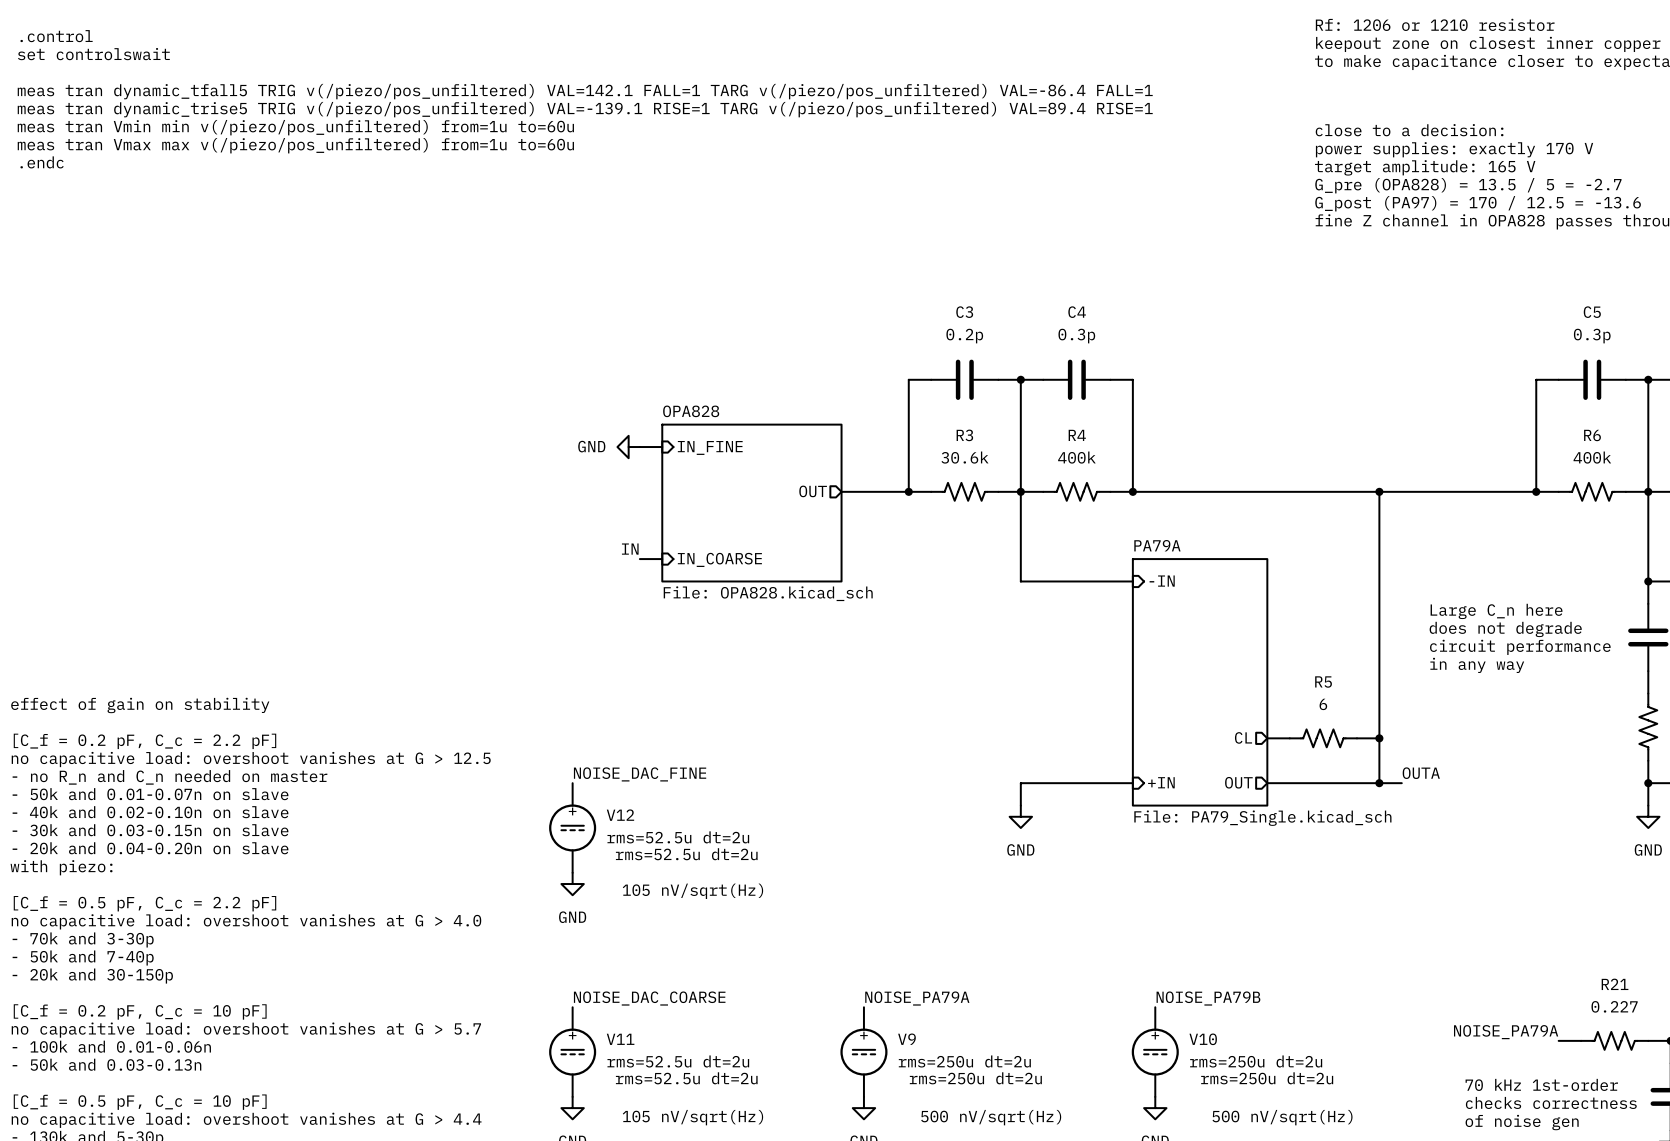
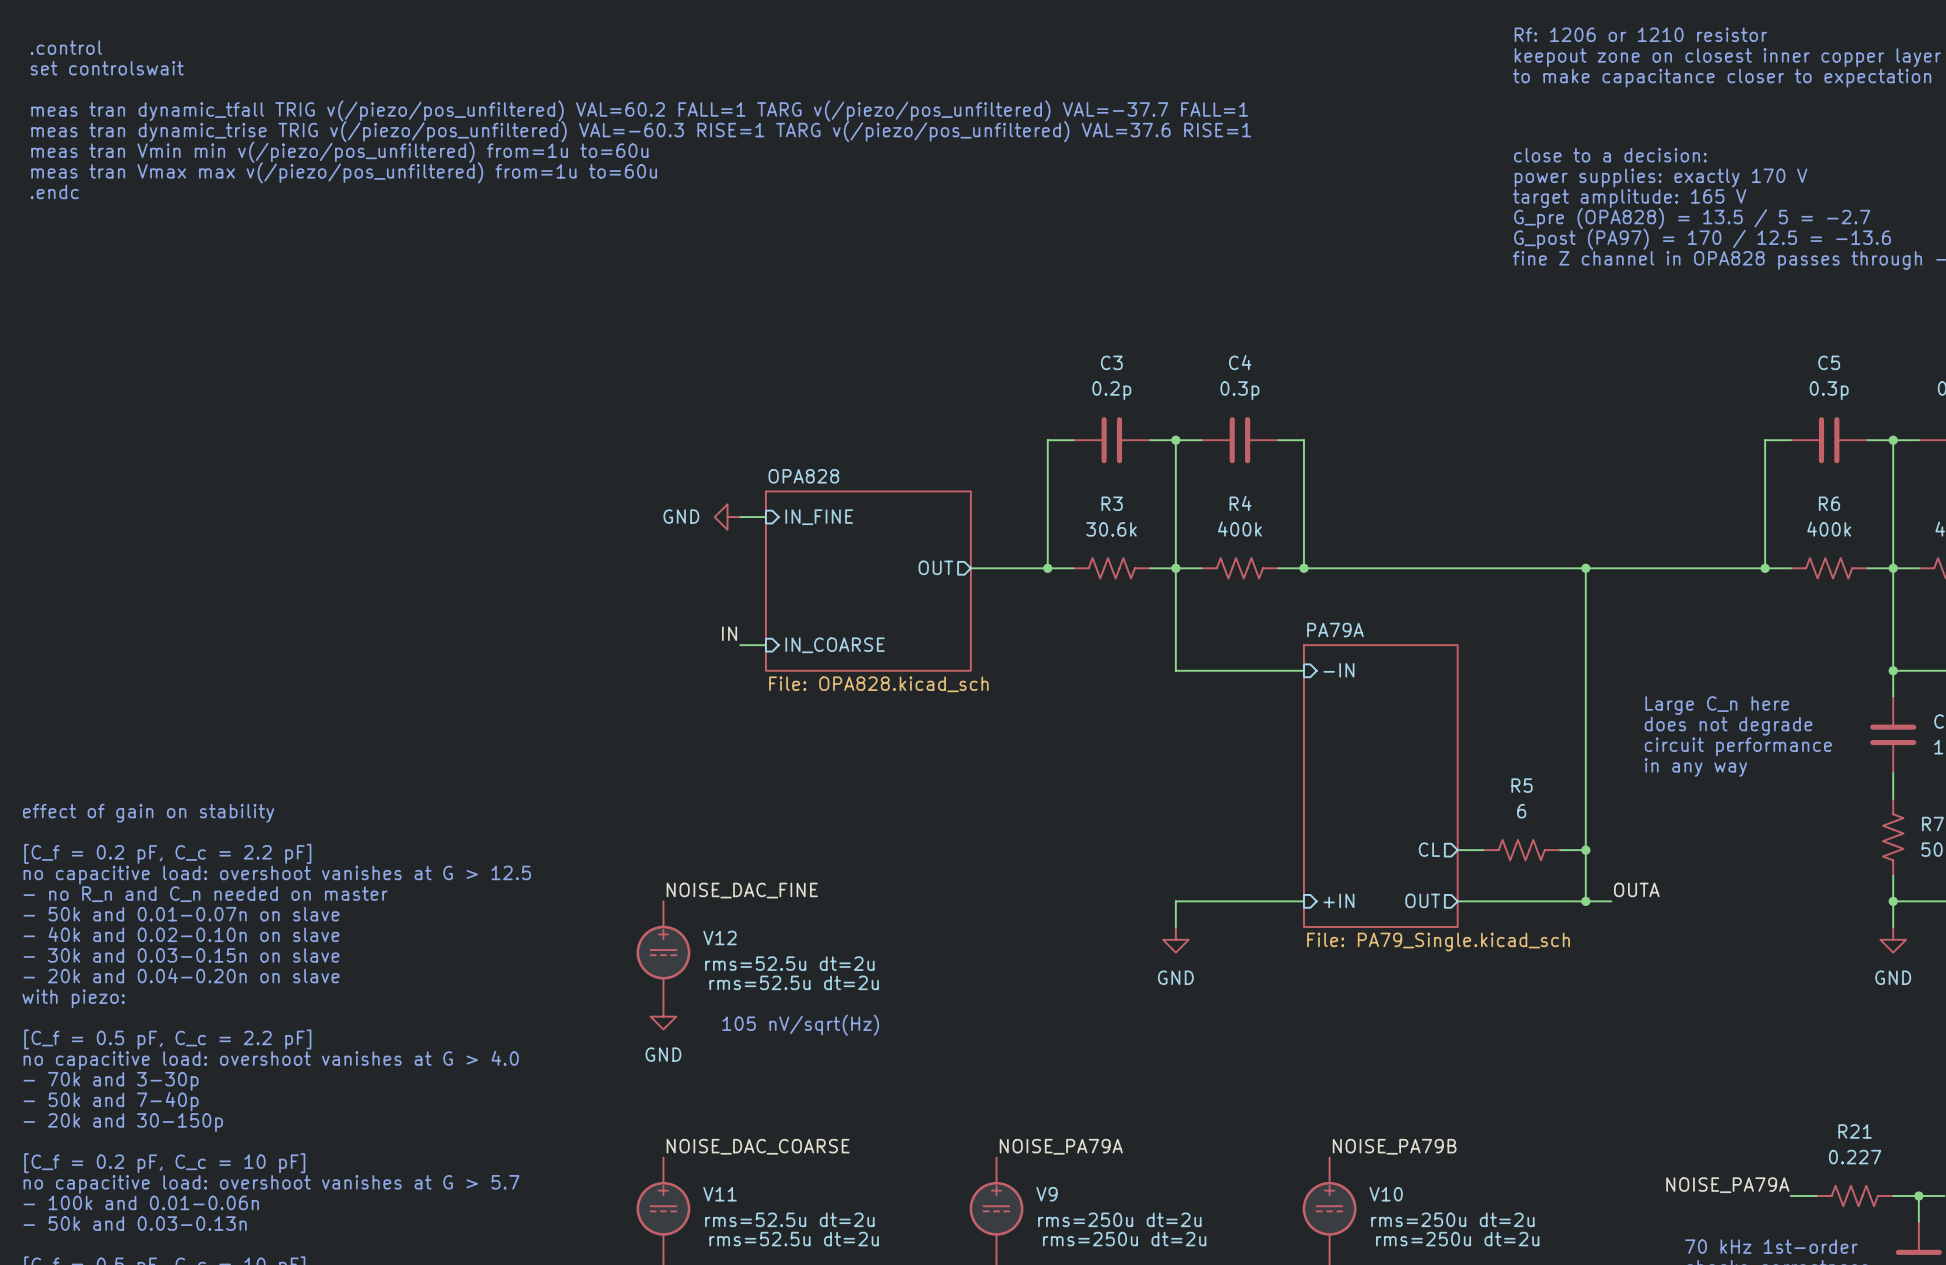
text: meas tran dynamic_tfall5 TRIG v(/piezo/pos_unfiltered) VAL=142.1 FALL=1 TARG v(/piezo/pos_unfiltered) VAL=-86.4 FALL=1 (585, 91) -> meas tran dynamic_tfall TRIG v(/piezo/pos_unfiltered) VAL=60.2 FALL=1 TARG v(/piezo/pos_unfiltered) VAL=-37.7 FALL=1 (639, 110)
text: meas tran dynamic_trise5 TRIG v(/piezo/pos_unfiltered) VAL=-139.1 RISE=1 TARG v(/piezo/pos_unfiltered) VAL=89.4 RISE=1 (585, 109) -> meas tran dynamic_trise TRIG v(/piezo/pos_unfiltered) VAL=-60.3 RISE=1 TARG v(/piezo/pos_unfiltered) VAL=37.6 RISE=1 (641, 131)

